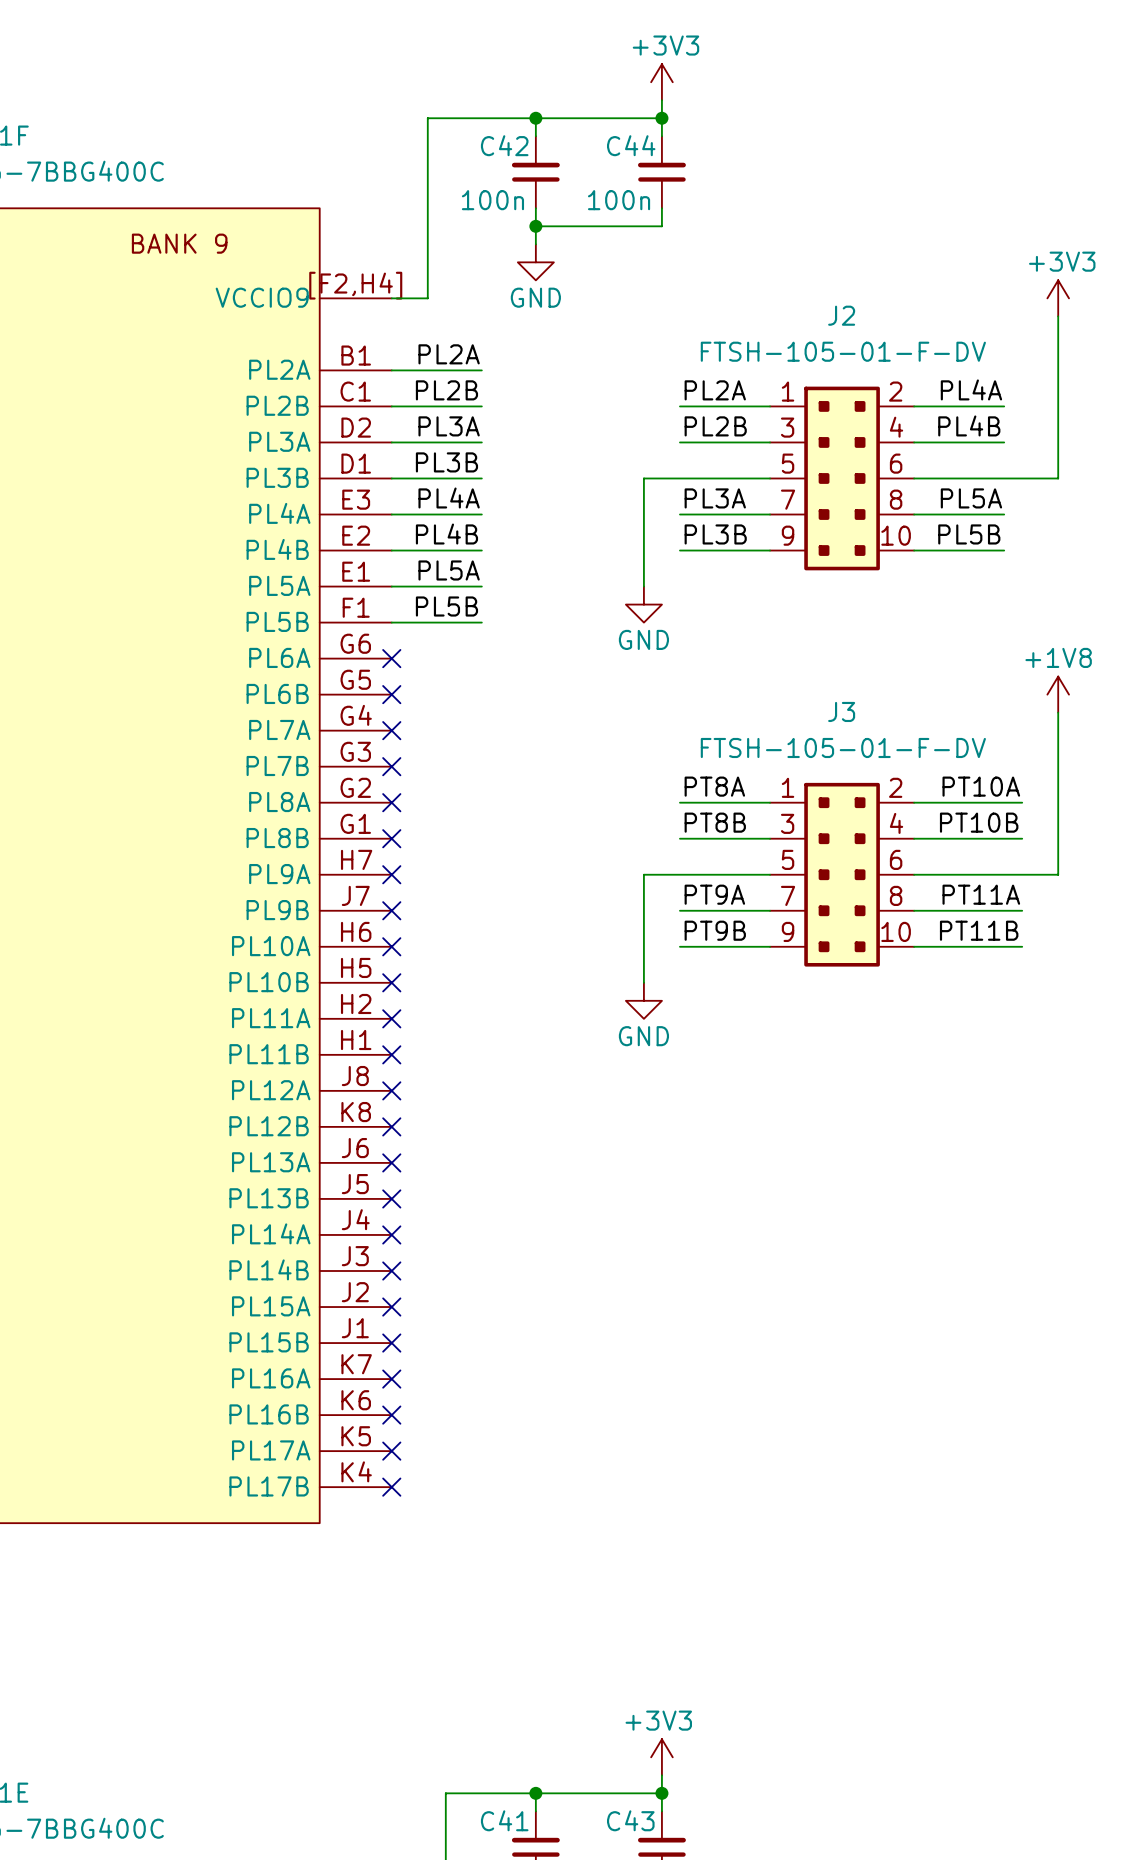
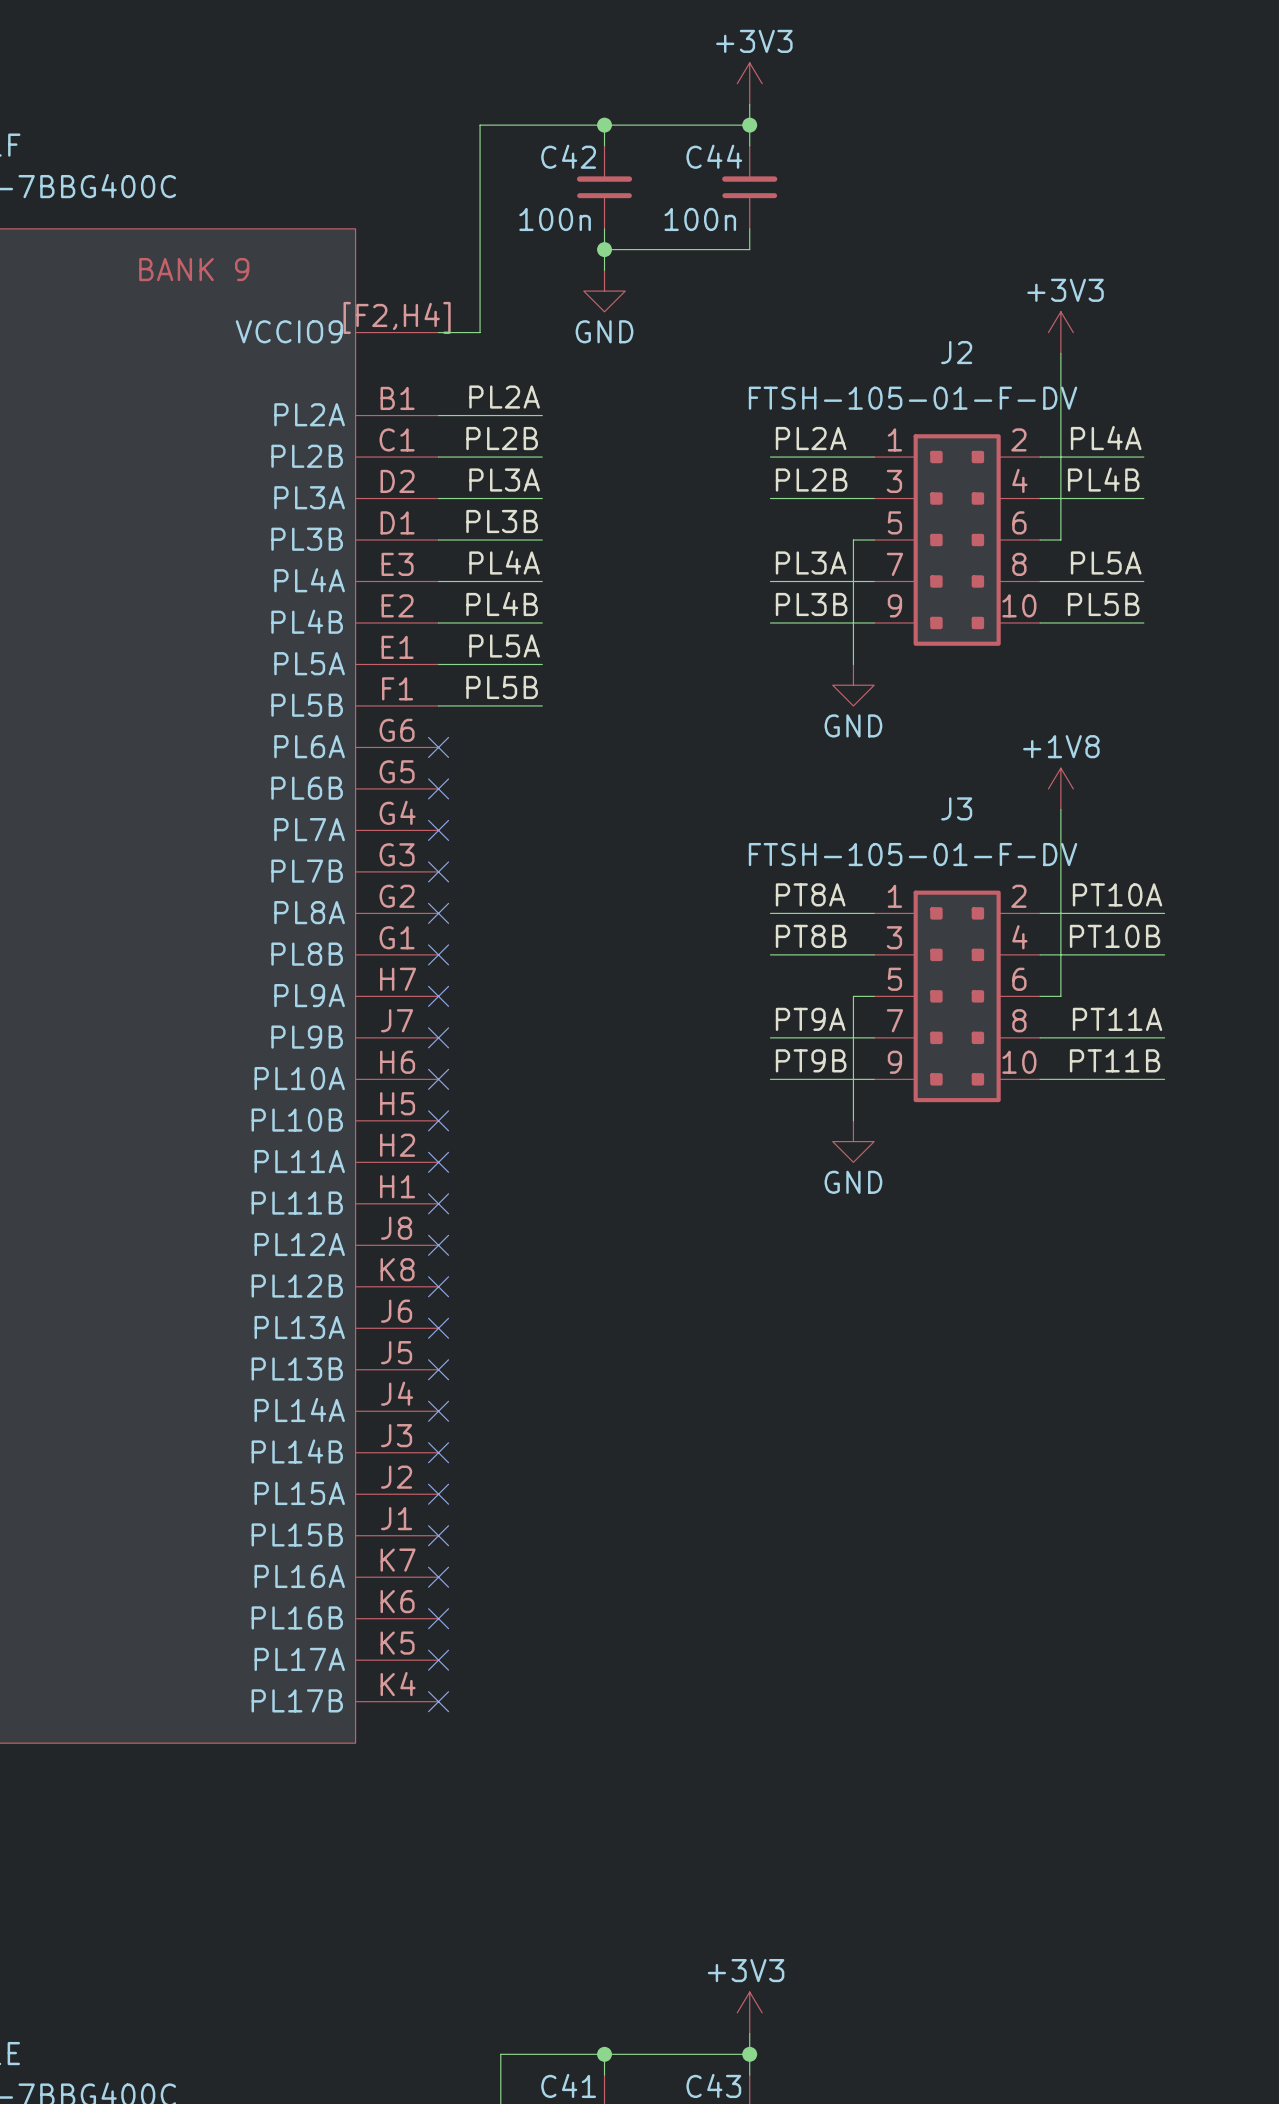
power symbol position: +3V3 (1058, 298) -> +3V3 (1060, 332)
wire: (1058, 316) (1058, 478) (932, 478) -> (1060, 353) (1060, 540)
J2 text position: FTSH-105-01-F-DV (843, 351) -> FTSH-105-01-F-DV (913, 398)
wire: (752, 478) (643, 478) (643, 586) -> (853, 540) (853, 664)
power symbol position: GND (643, 604) -> GND (853, 685)
power symbol position: +1V8 (1058, 694) -> +1V8 (1060, 788)
wire: (1058, 712) (1058, 874) (932, 874) -> (1060, 809) (1060, 996)
J3 text position: FTSH-105-01-F-DV (843, 747) -> FTSH-105-01-F-DV (913, 854)
wire: (752, 874) (643, 874) (643, 982) -> (853, 996) (853, 1120)
power symbol position: GND (643, 1000) -> GND (853, 1141)

